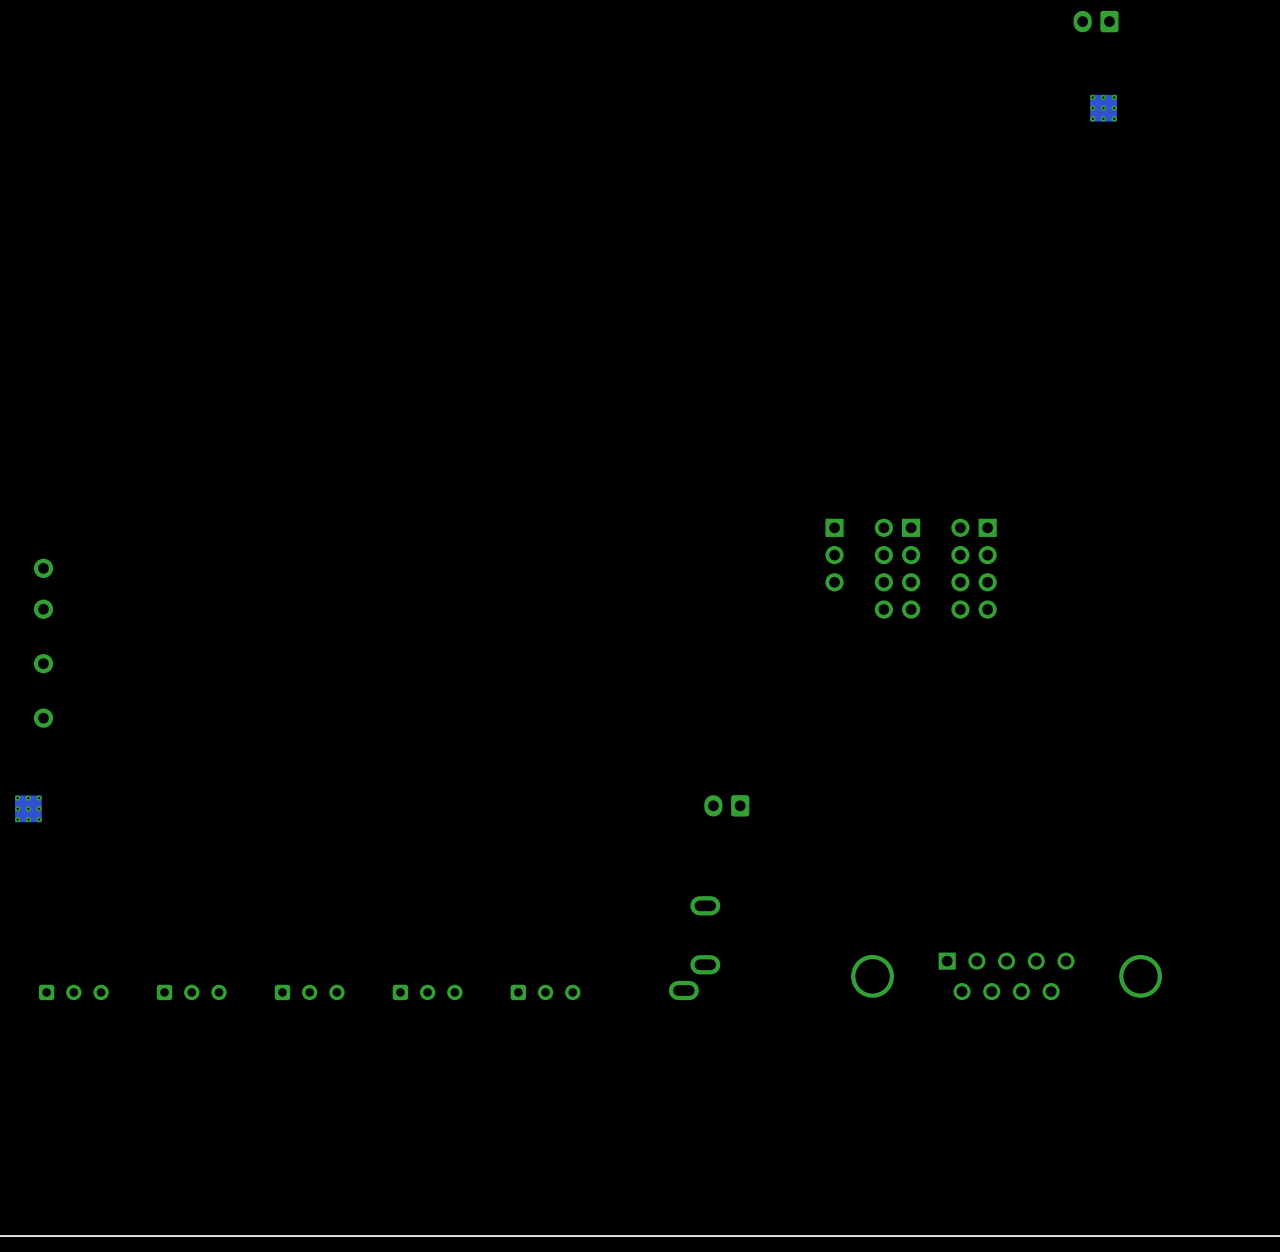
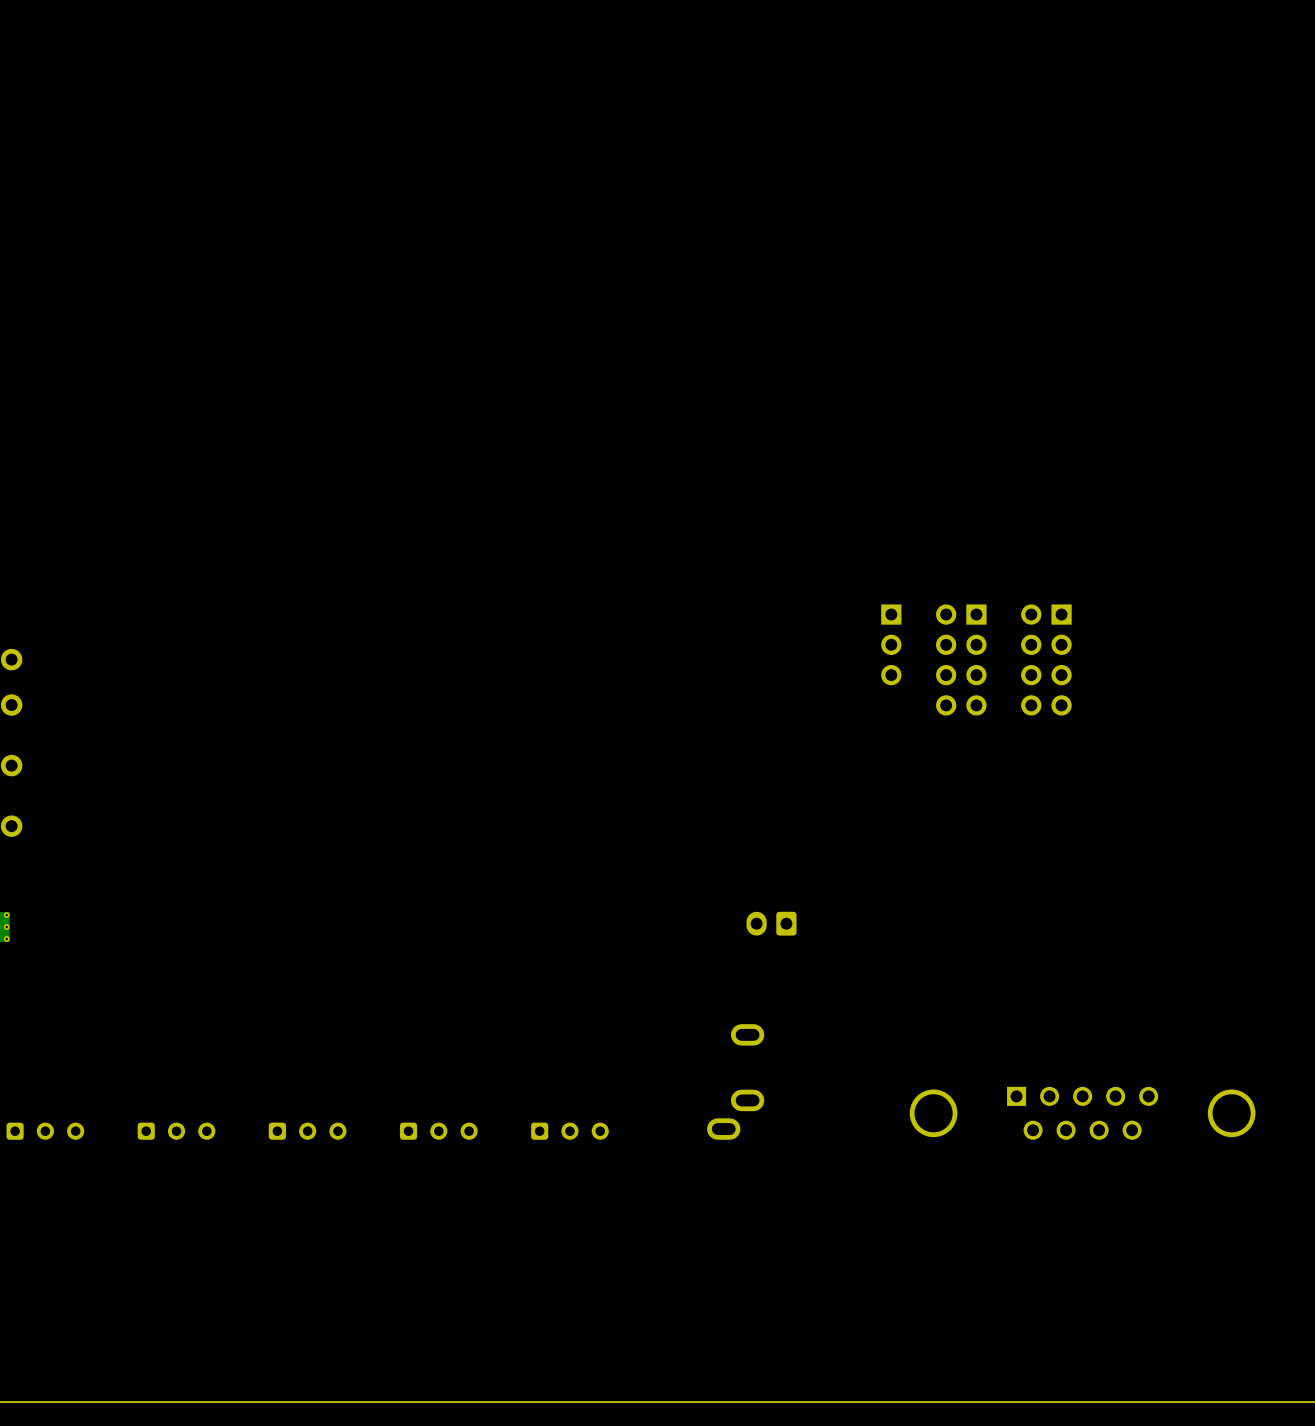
part: (1096, 21) -> none
part: (1103, 108) -> none

